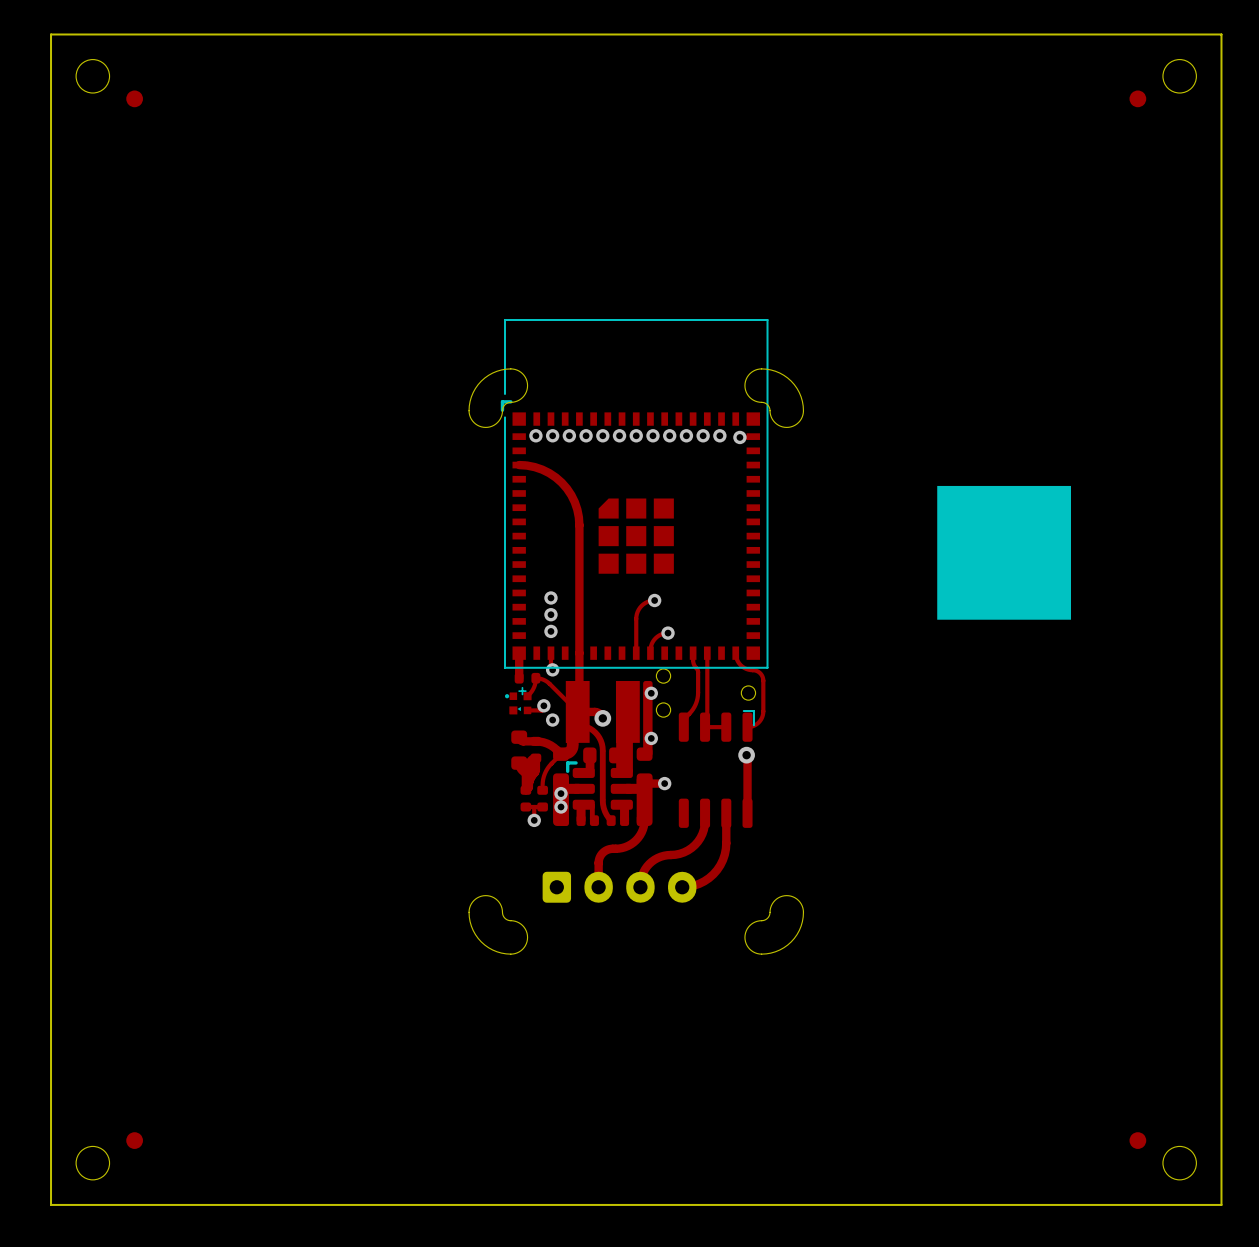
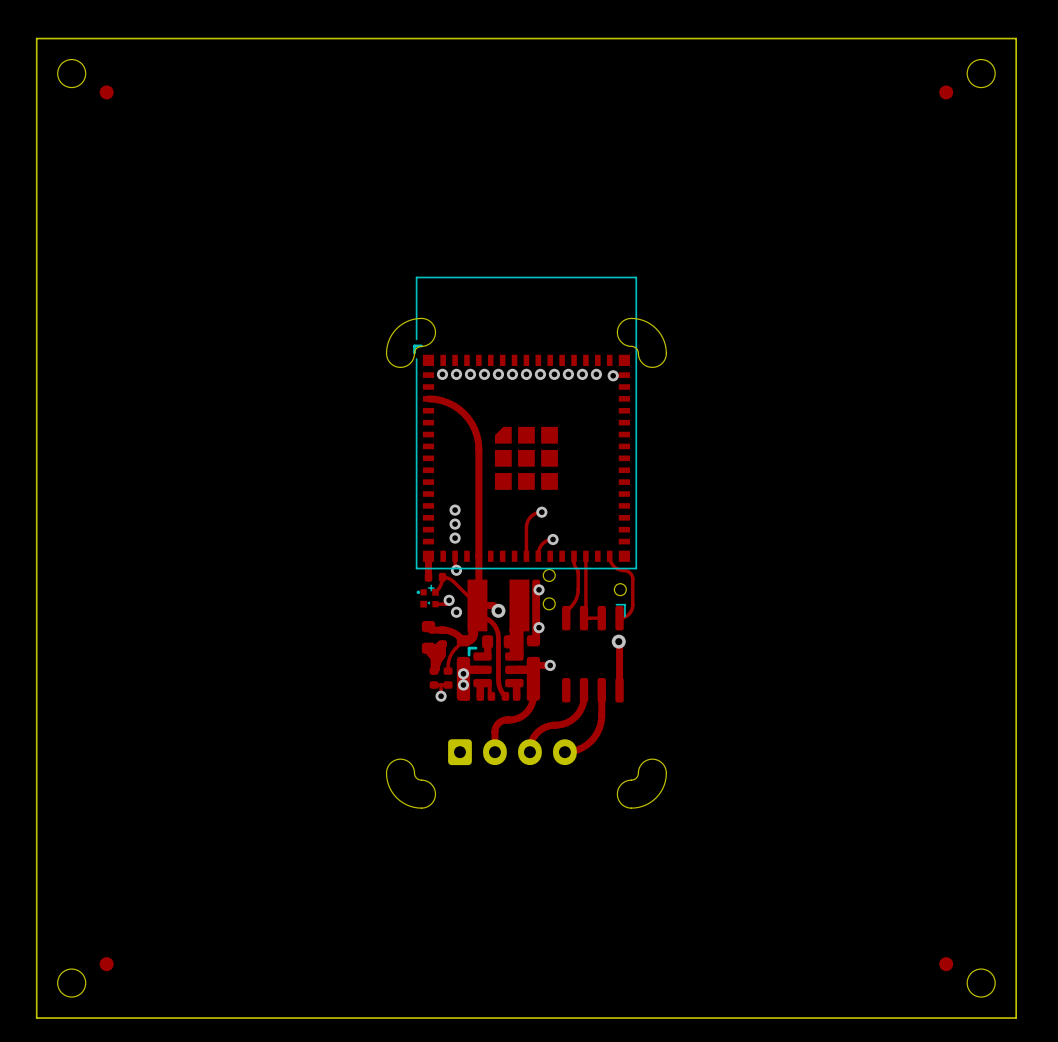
drawing: [937, 485, 1071, 620] -> none

